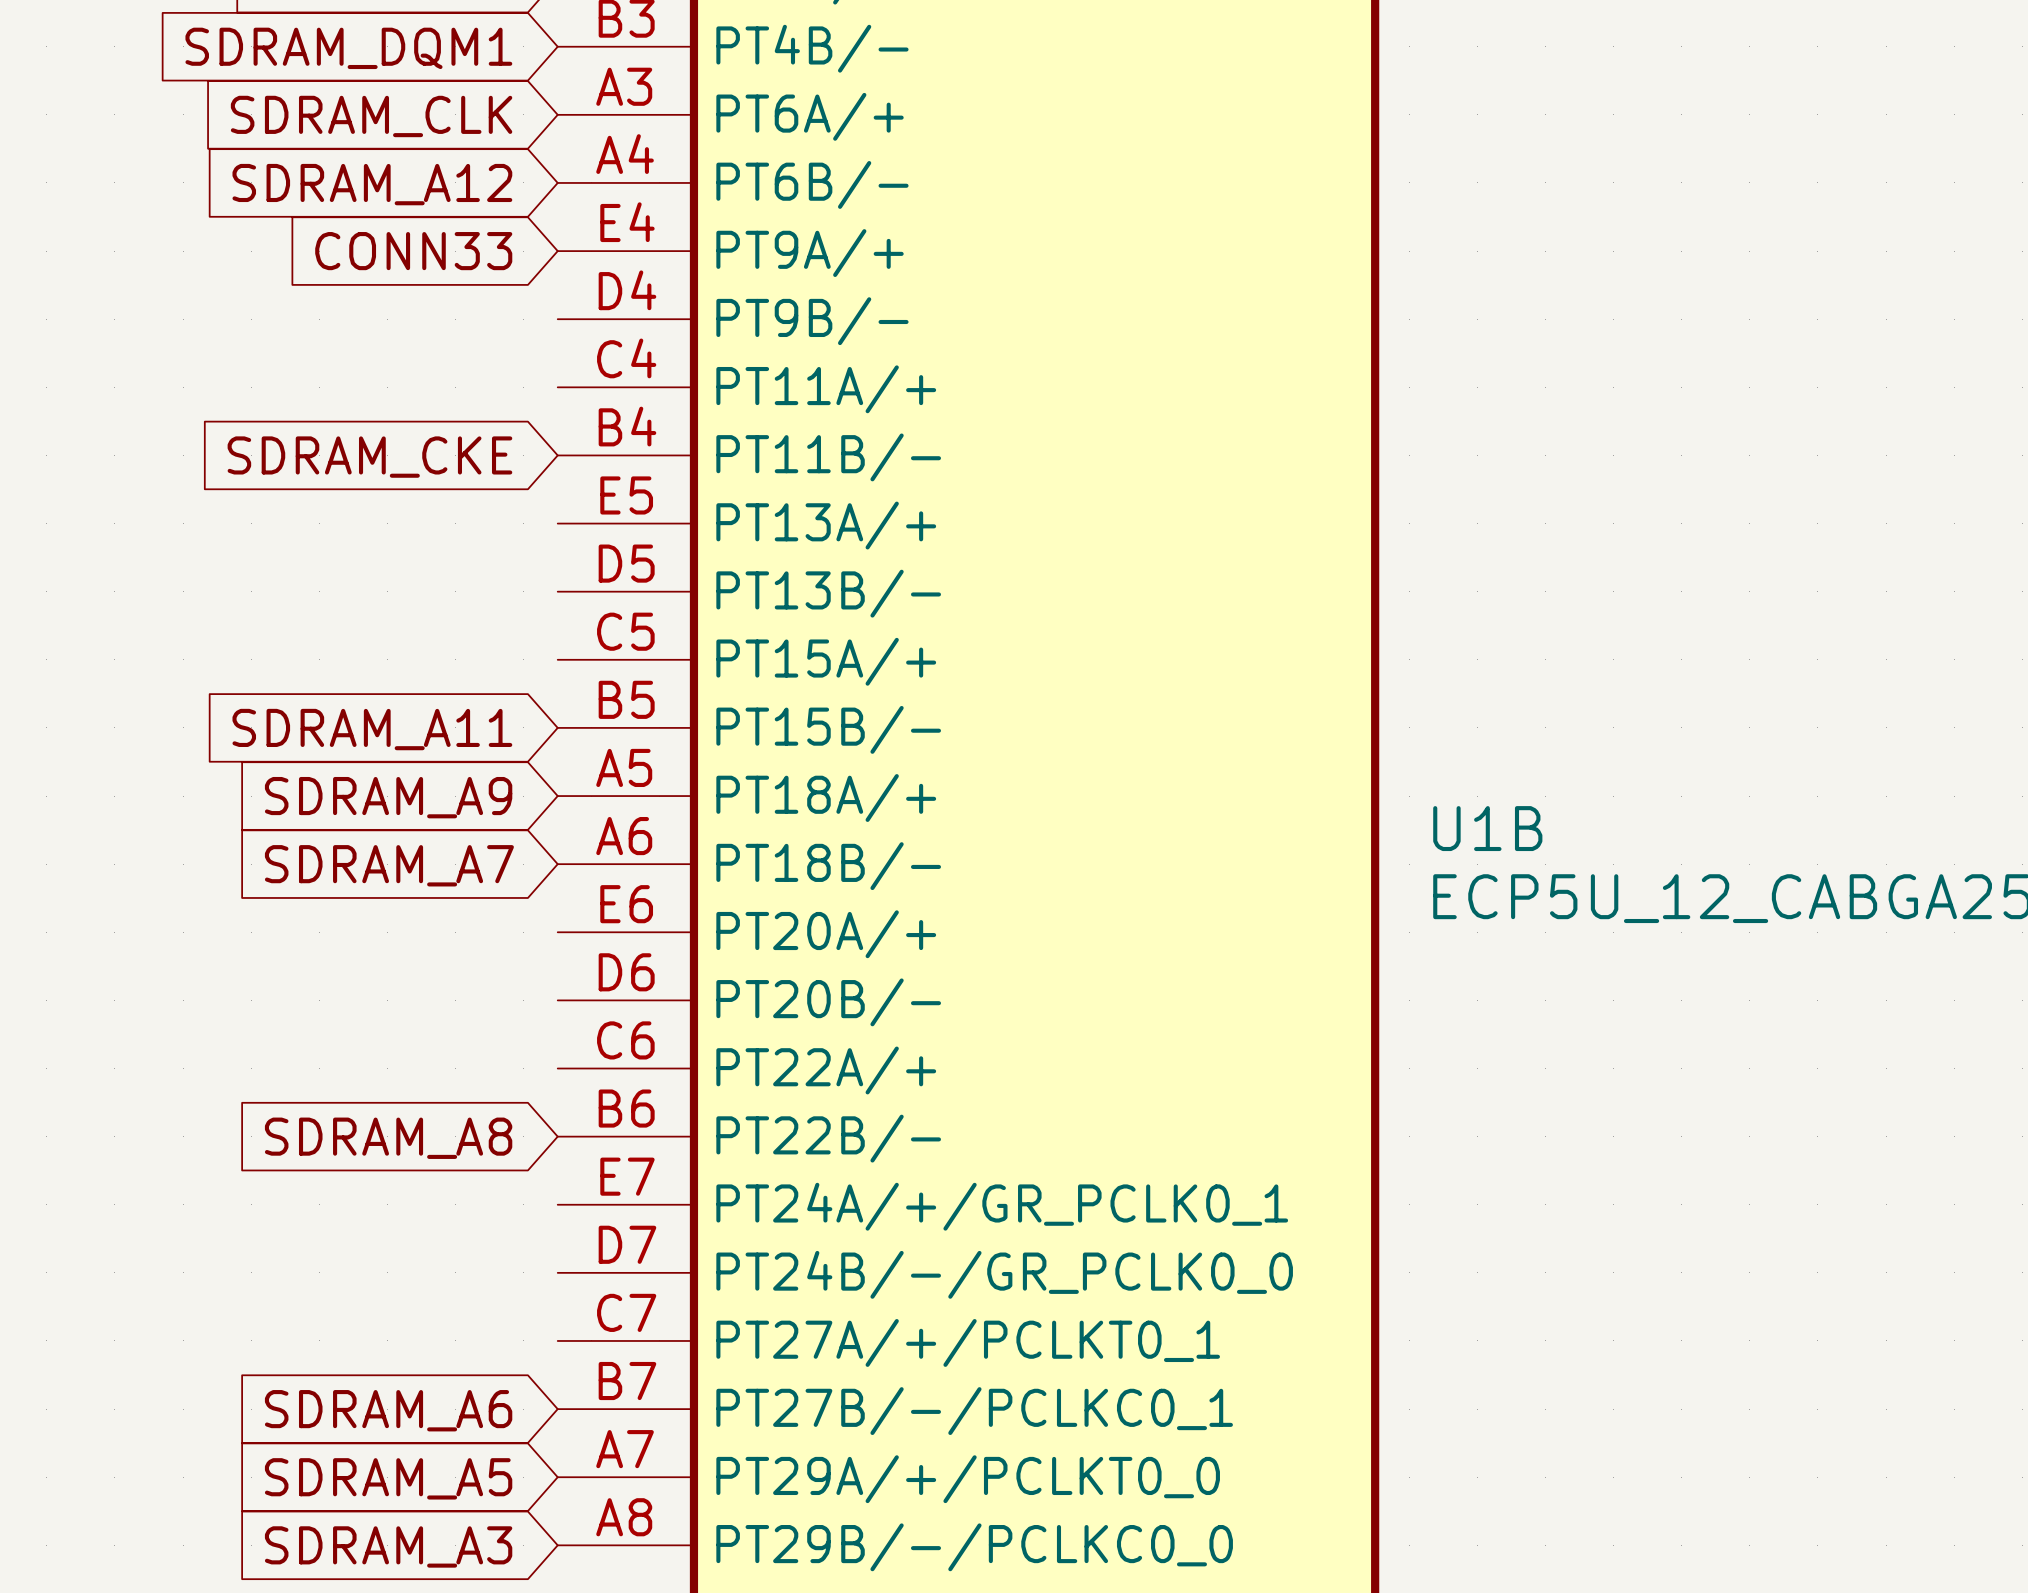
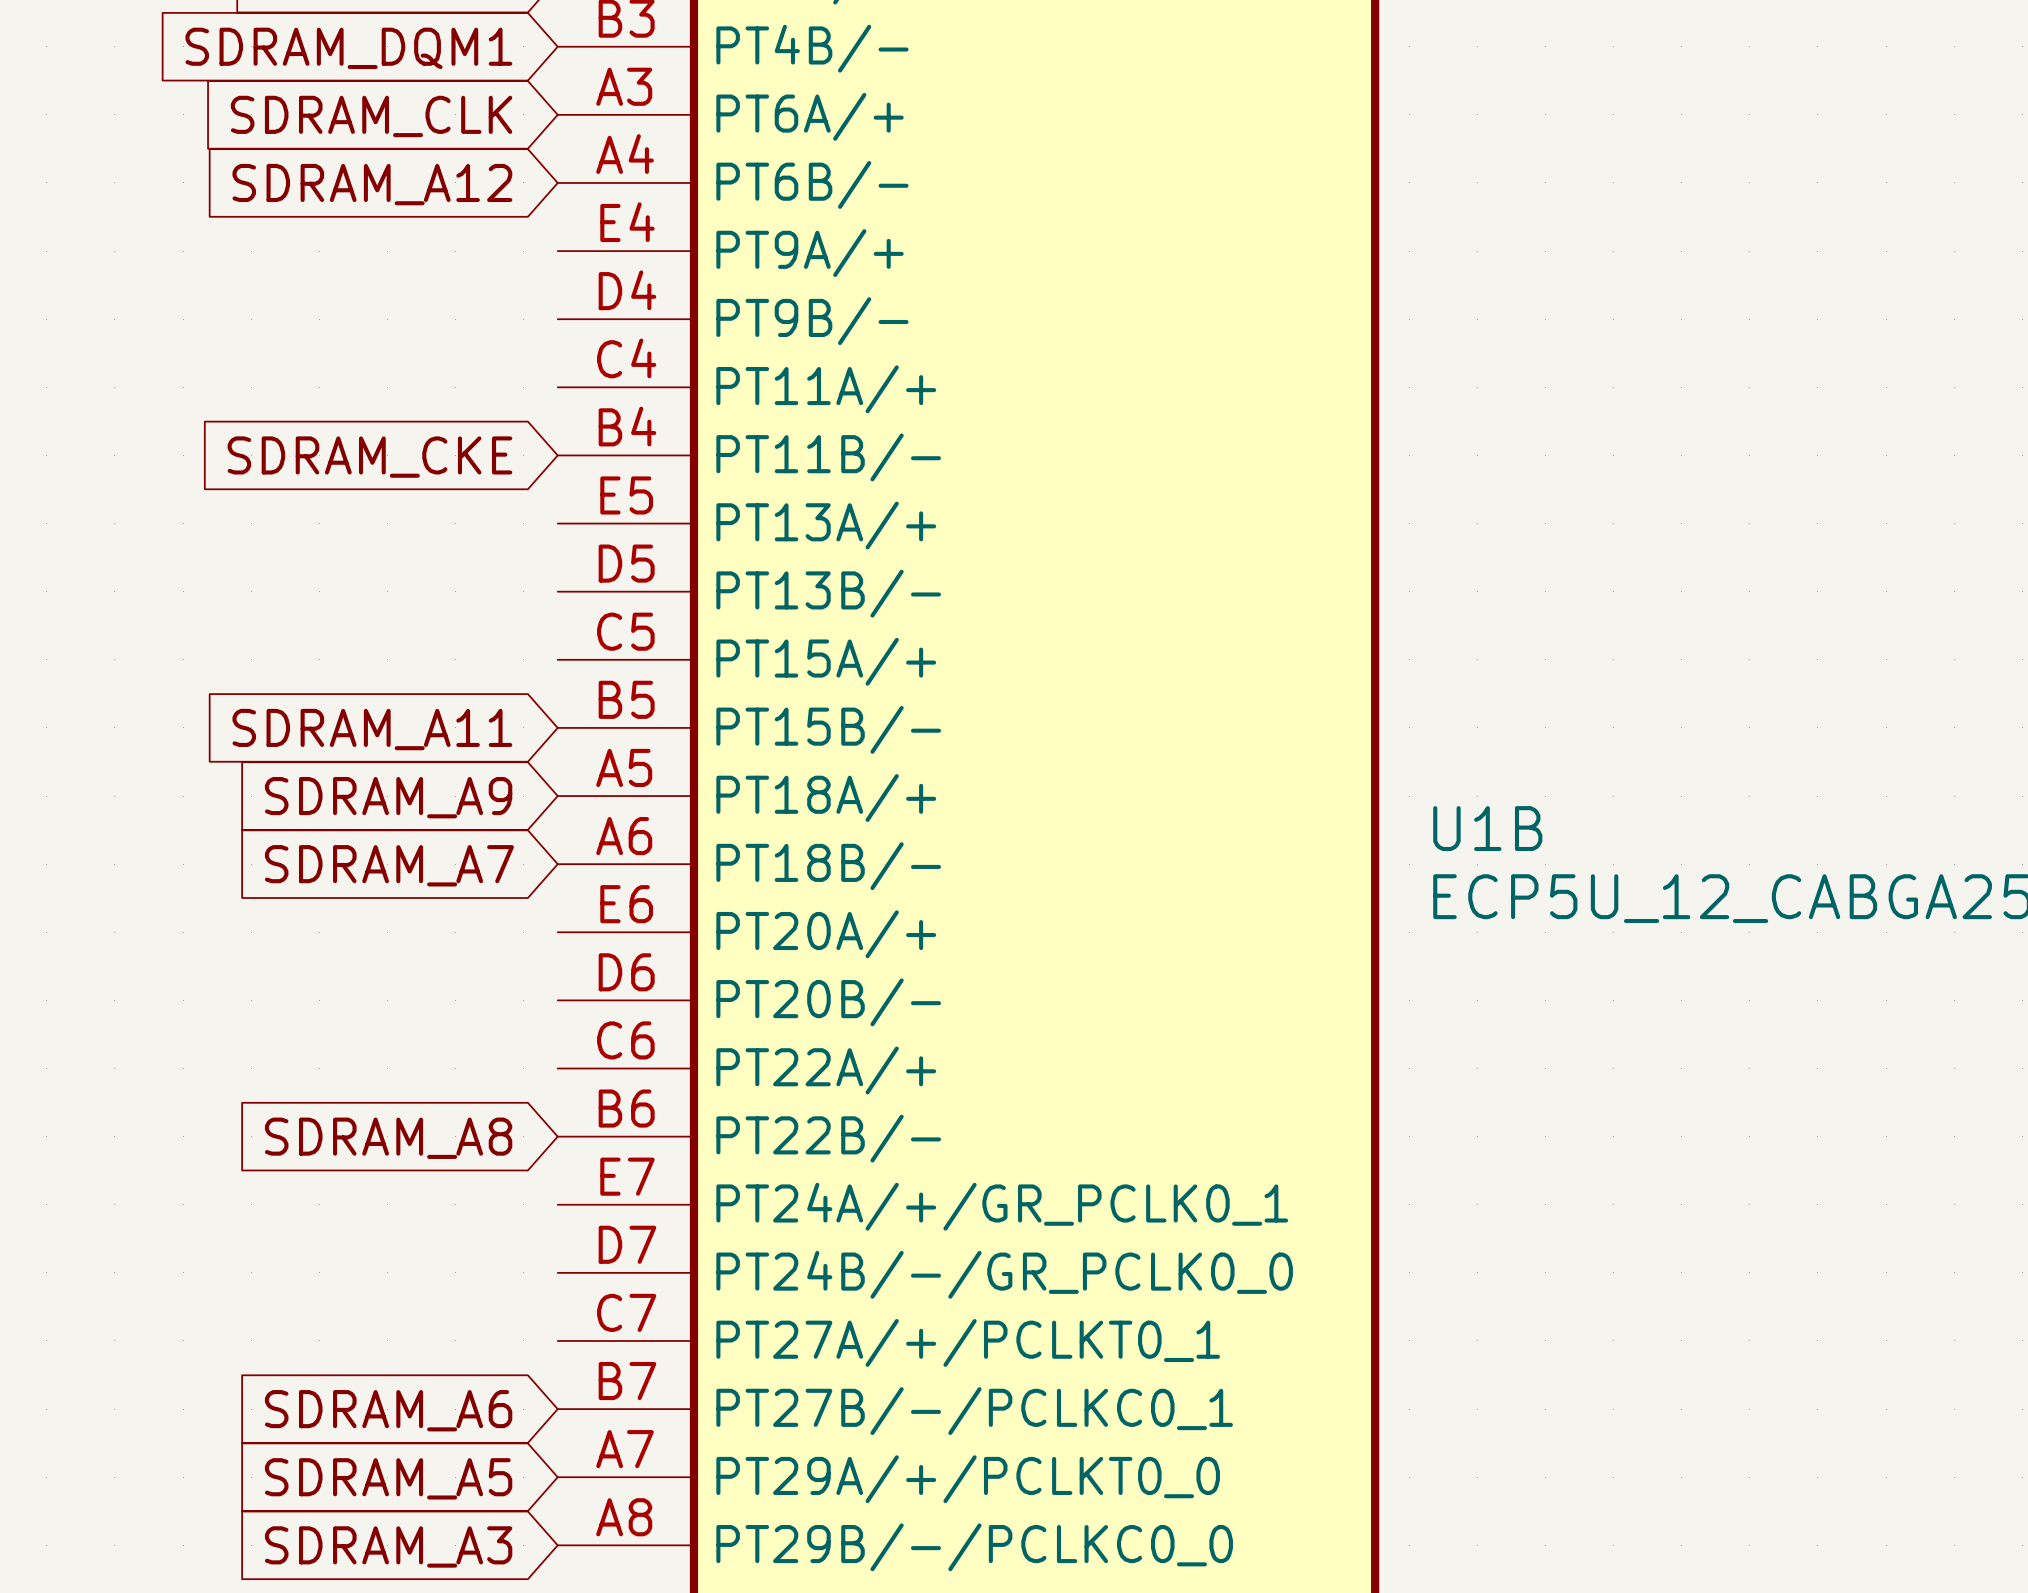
global label: CONN33 (413, 251) -> none

